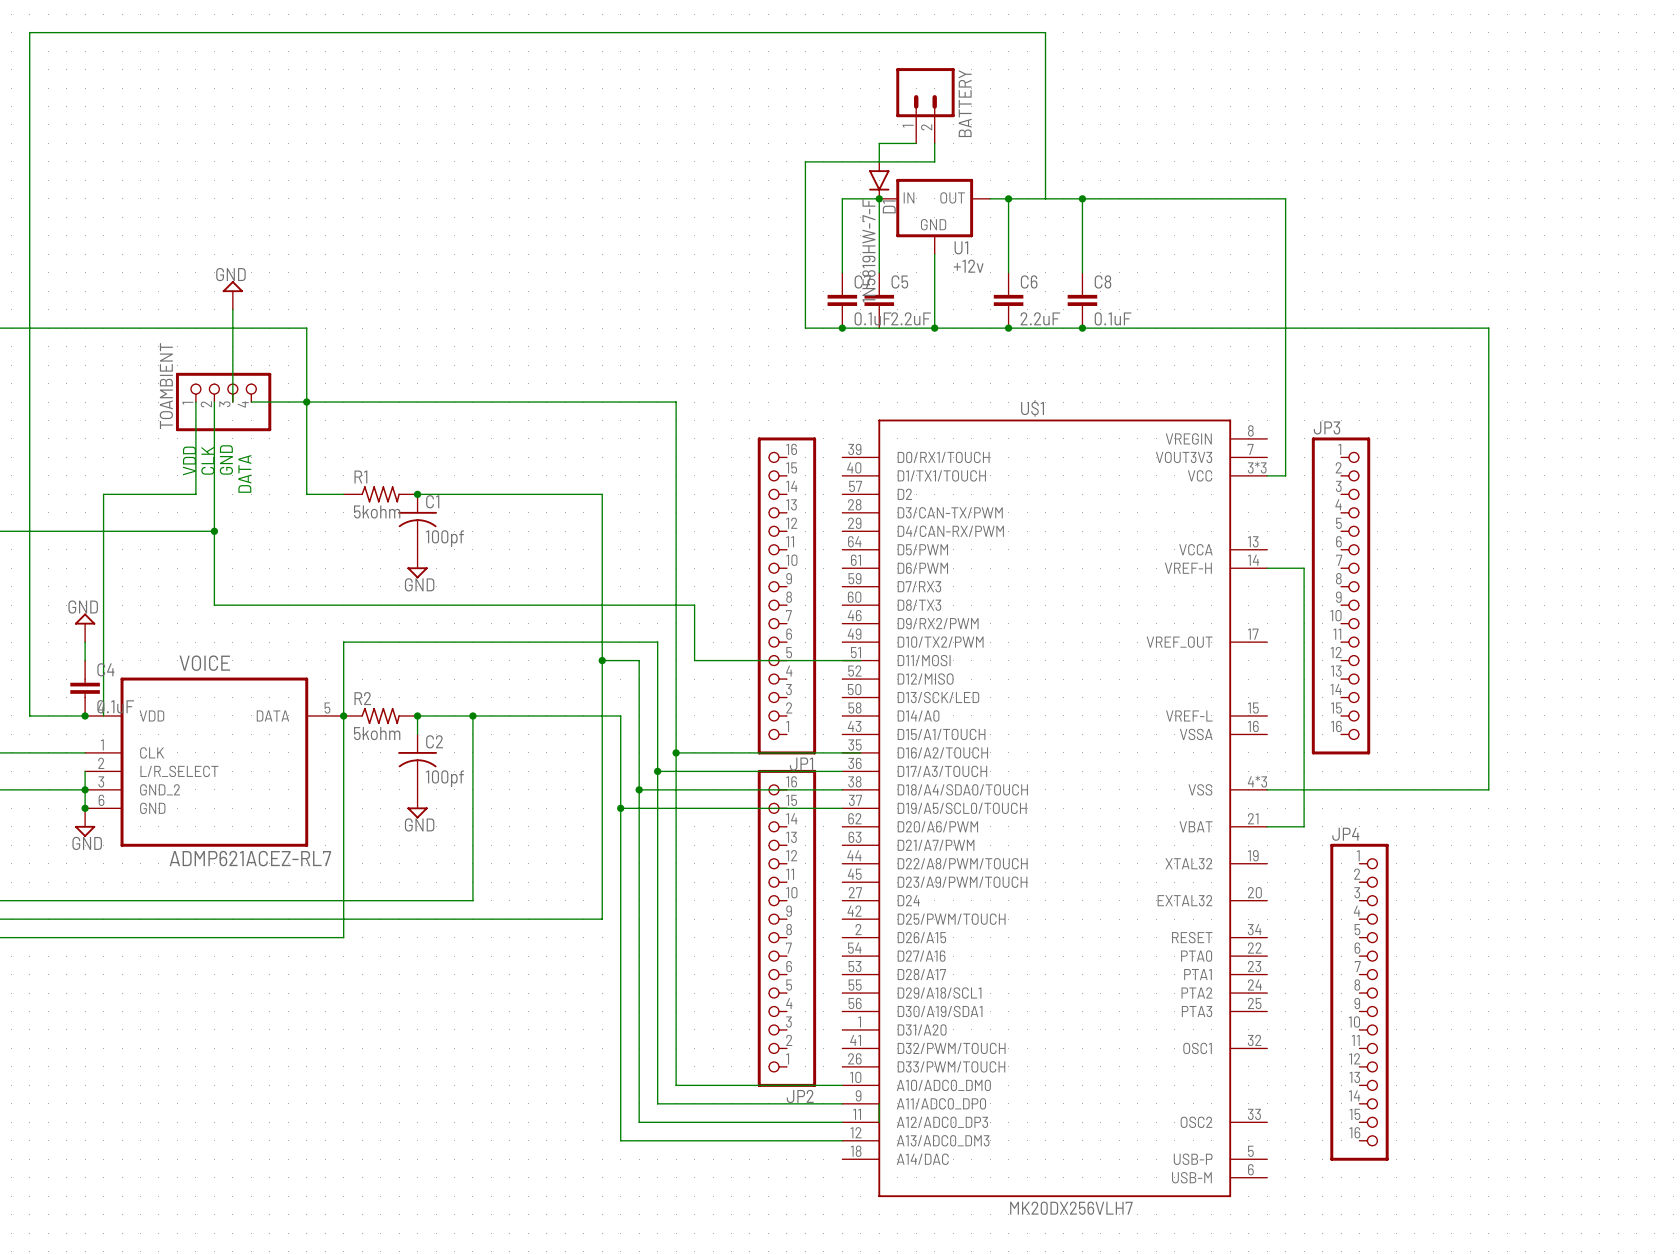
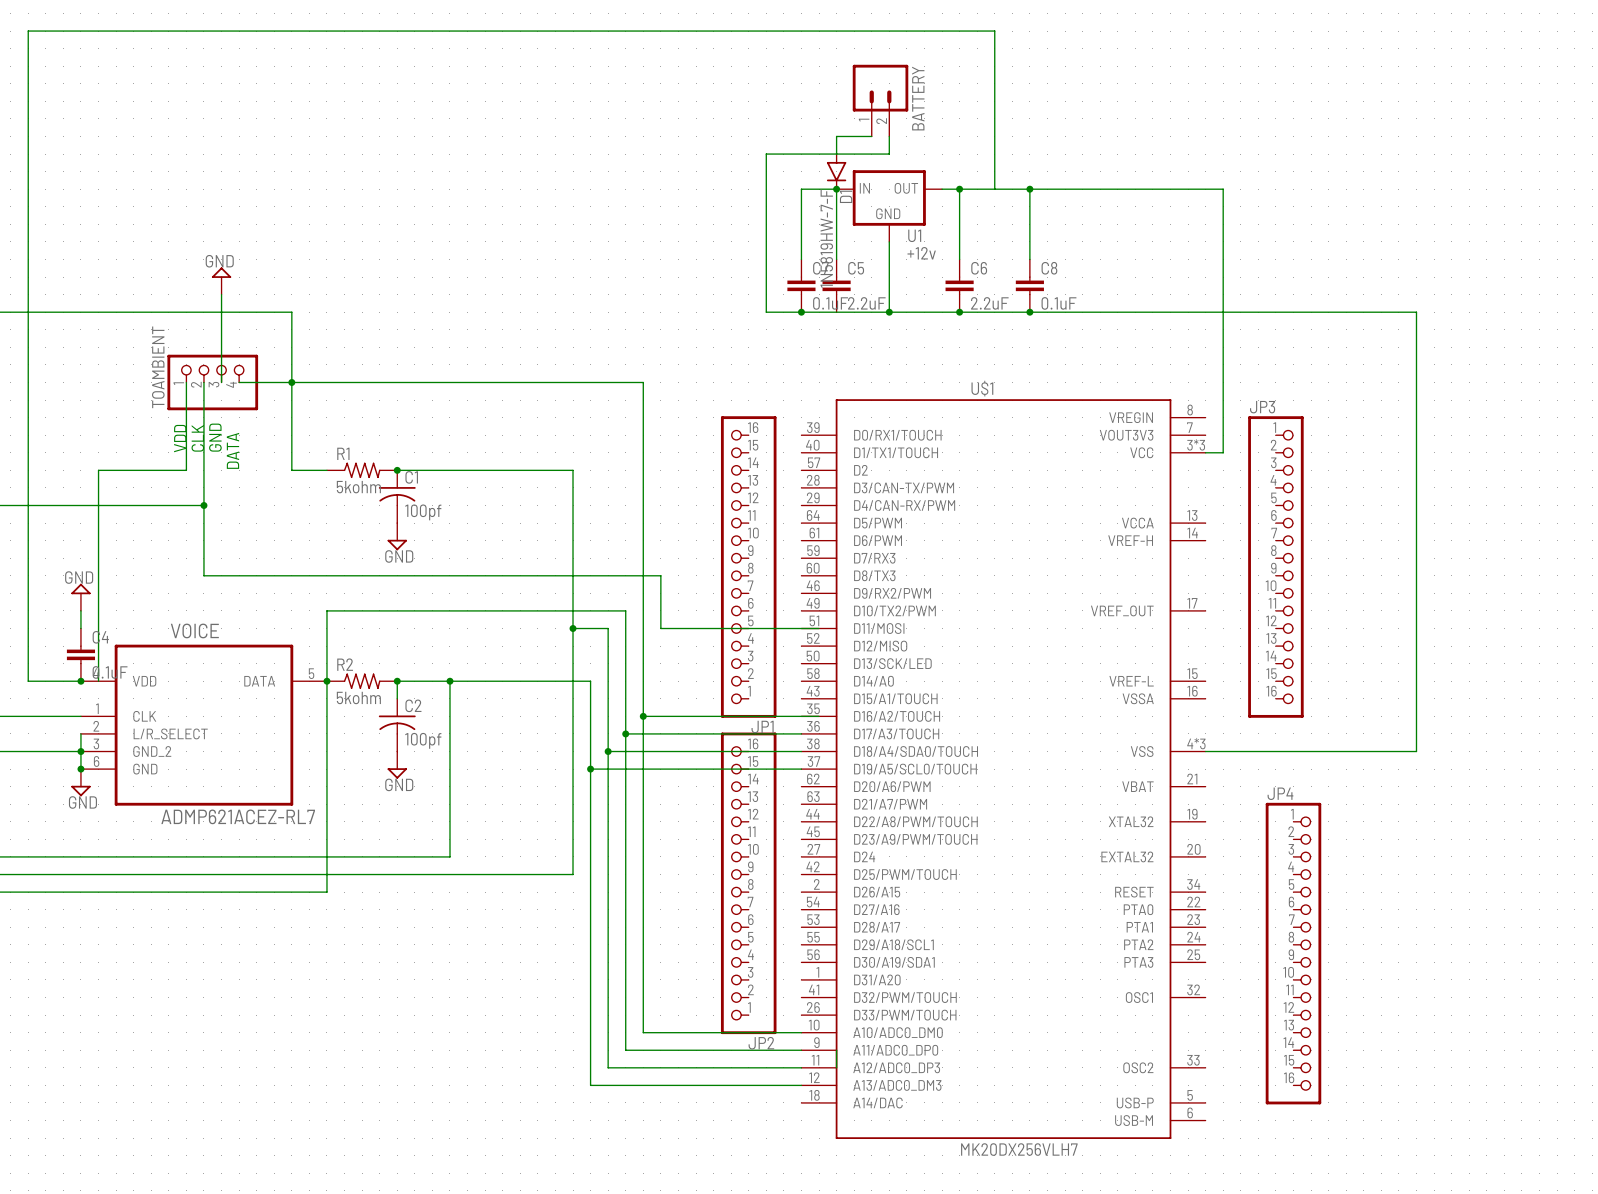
wire: (1267, 568) (1304, 568) (1304, 826) (1267, 826) -> none

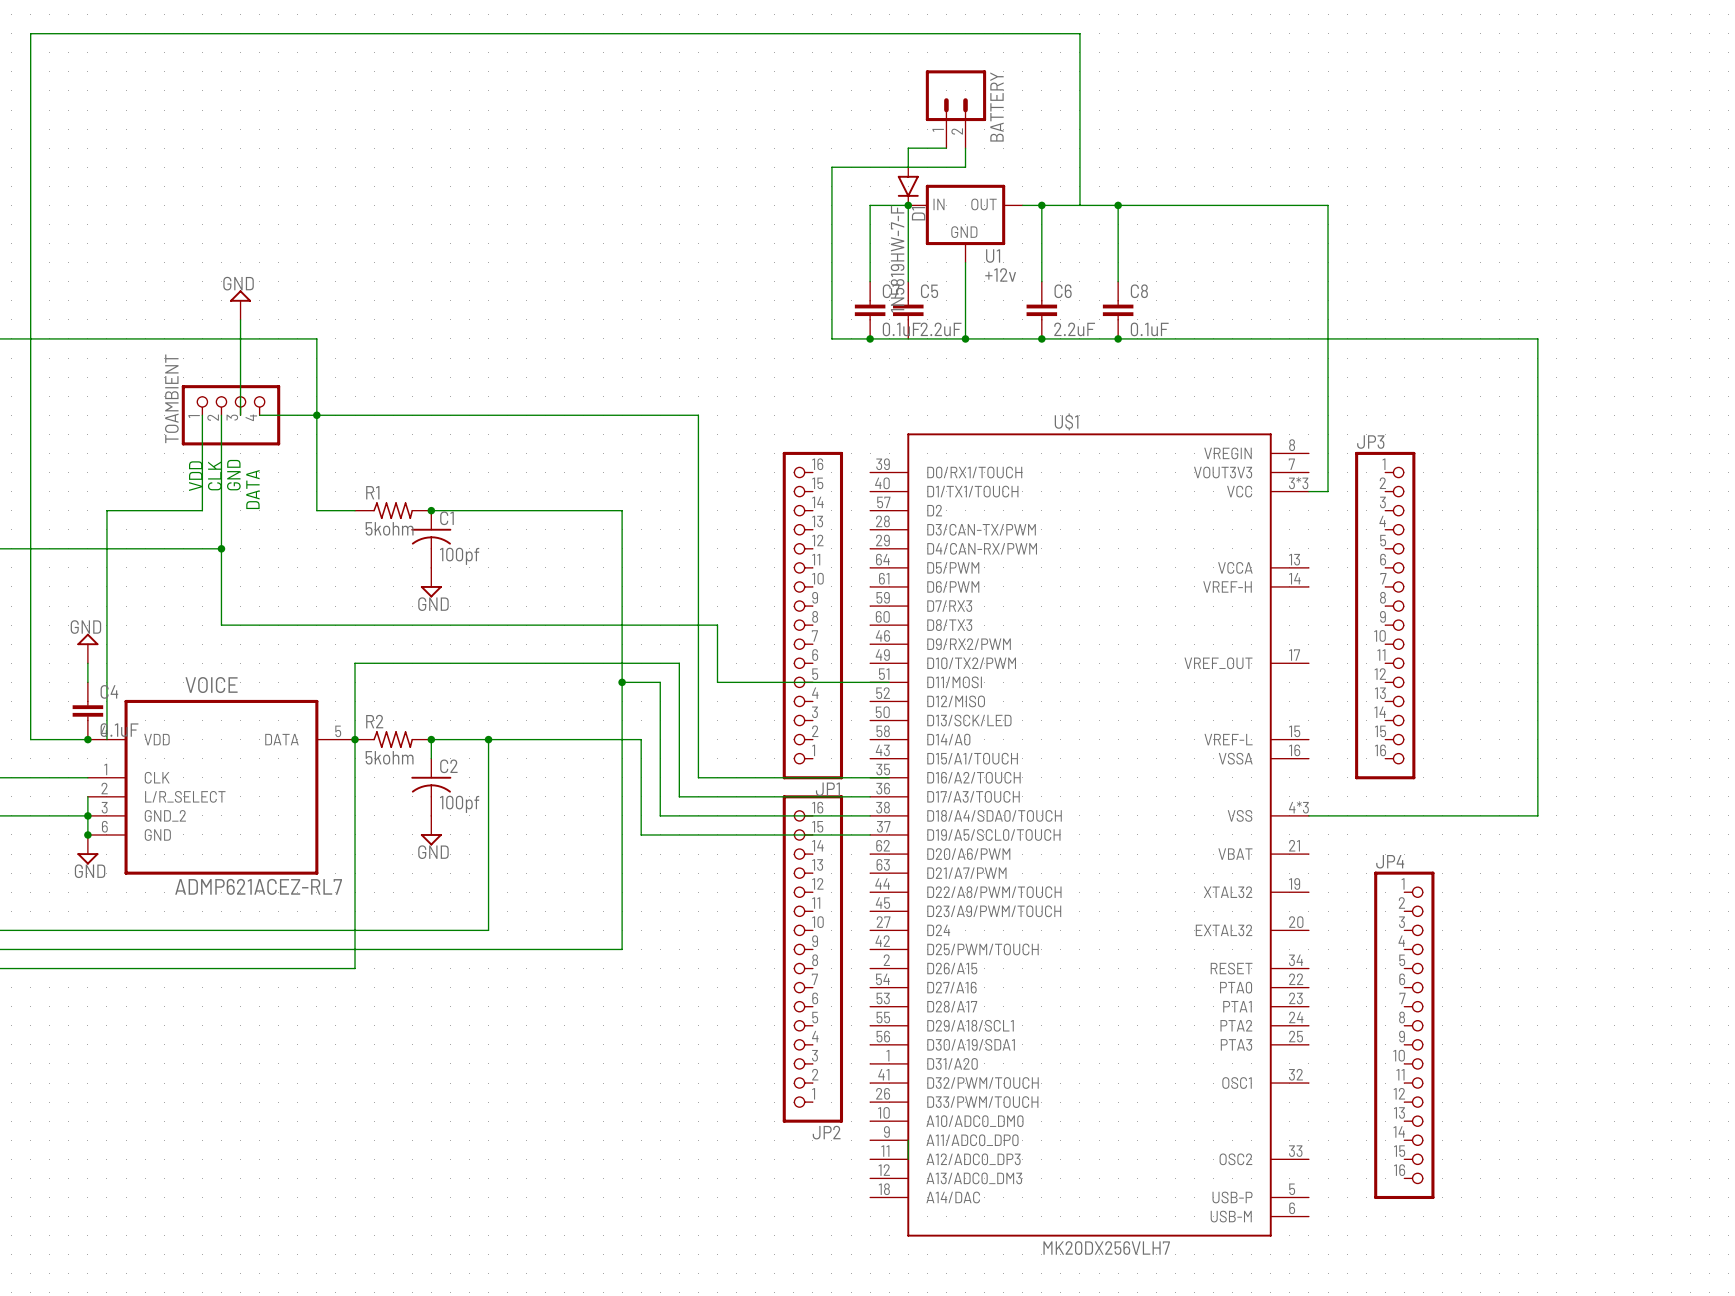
wire: (643, 716) (643, 1032) (801, 1032) -> none
junction: (643, 716) -> none
wire: (625, 733) (625, 1050) (801, 1050) -> none
junction: (625, 733) -> none
wire: (608, 751) (608, 1067) (801, 1067) -> none
junction: (608, 751) -> none
wire: (590, 769) (590, 1085) (801, 1085) -> none
junction: (590, 769) -> none

